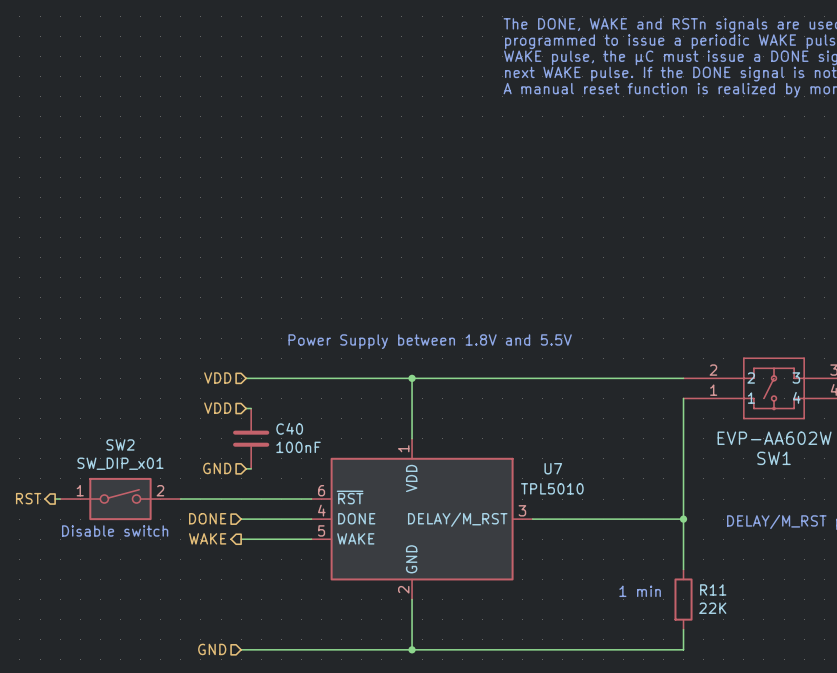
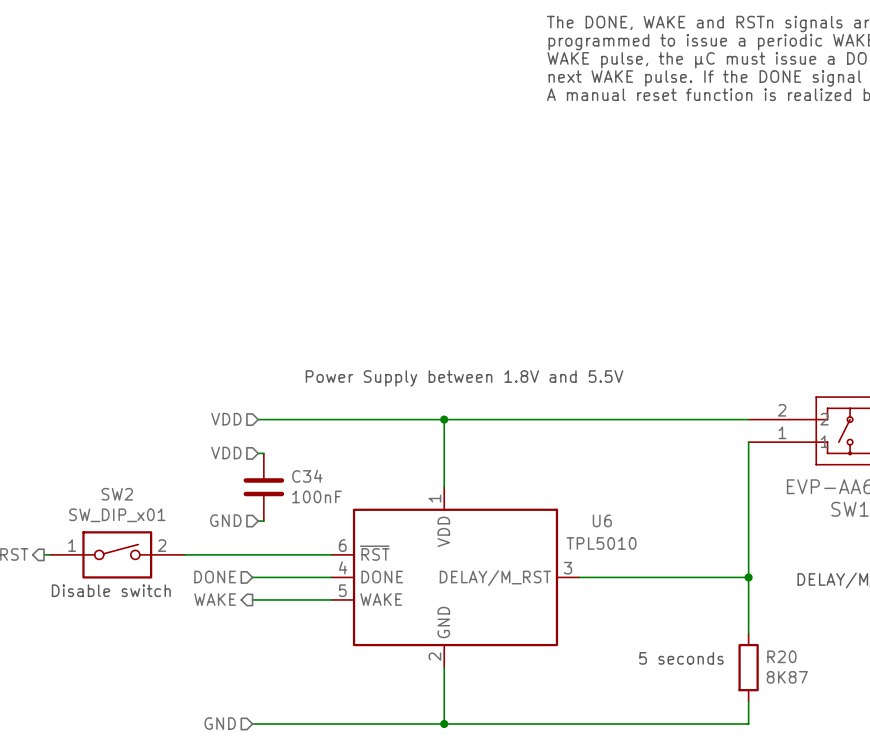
C40 name: C40 (289, 428) -> C34 (307, 476)
U7 name: U7 (553, 468) -> U6 (602, 520)
R11 name: R11 (713, 589) -> R20 (781, 656)
text: 1 min (640, 591) -> 5 seconds (681, 658)
R11 value: 22K (712, 608) -> 8K87 (787, 677)

